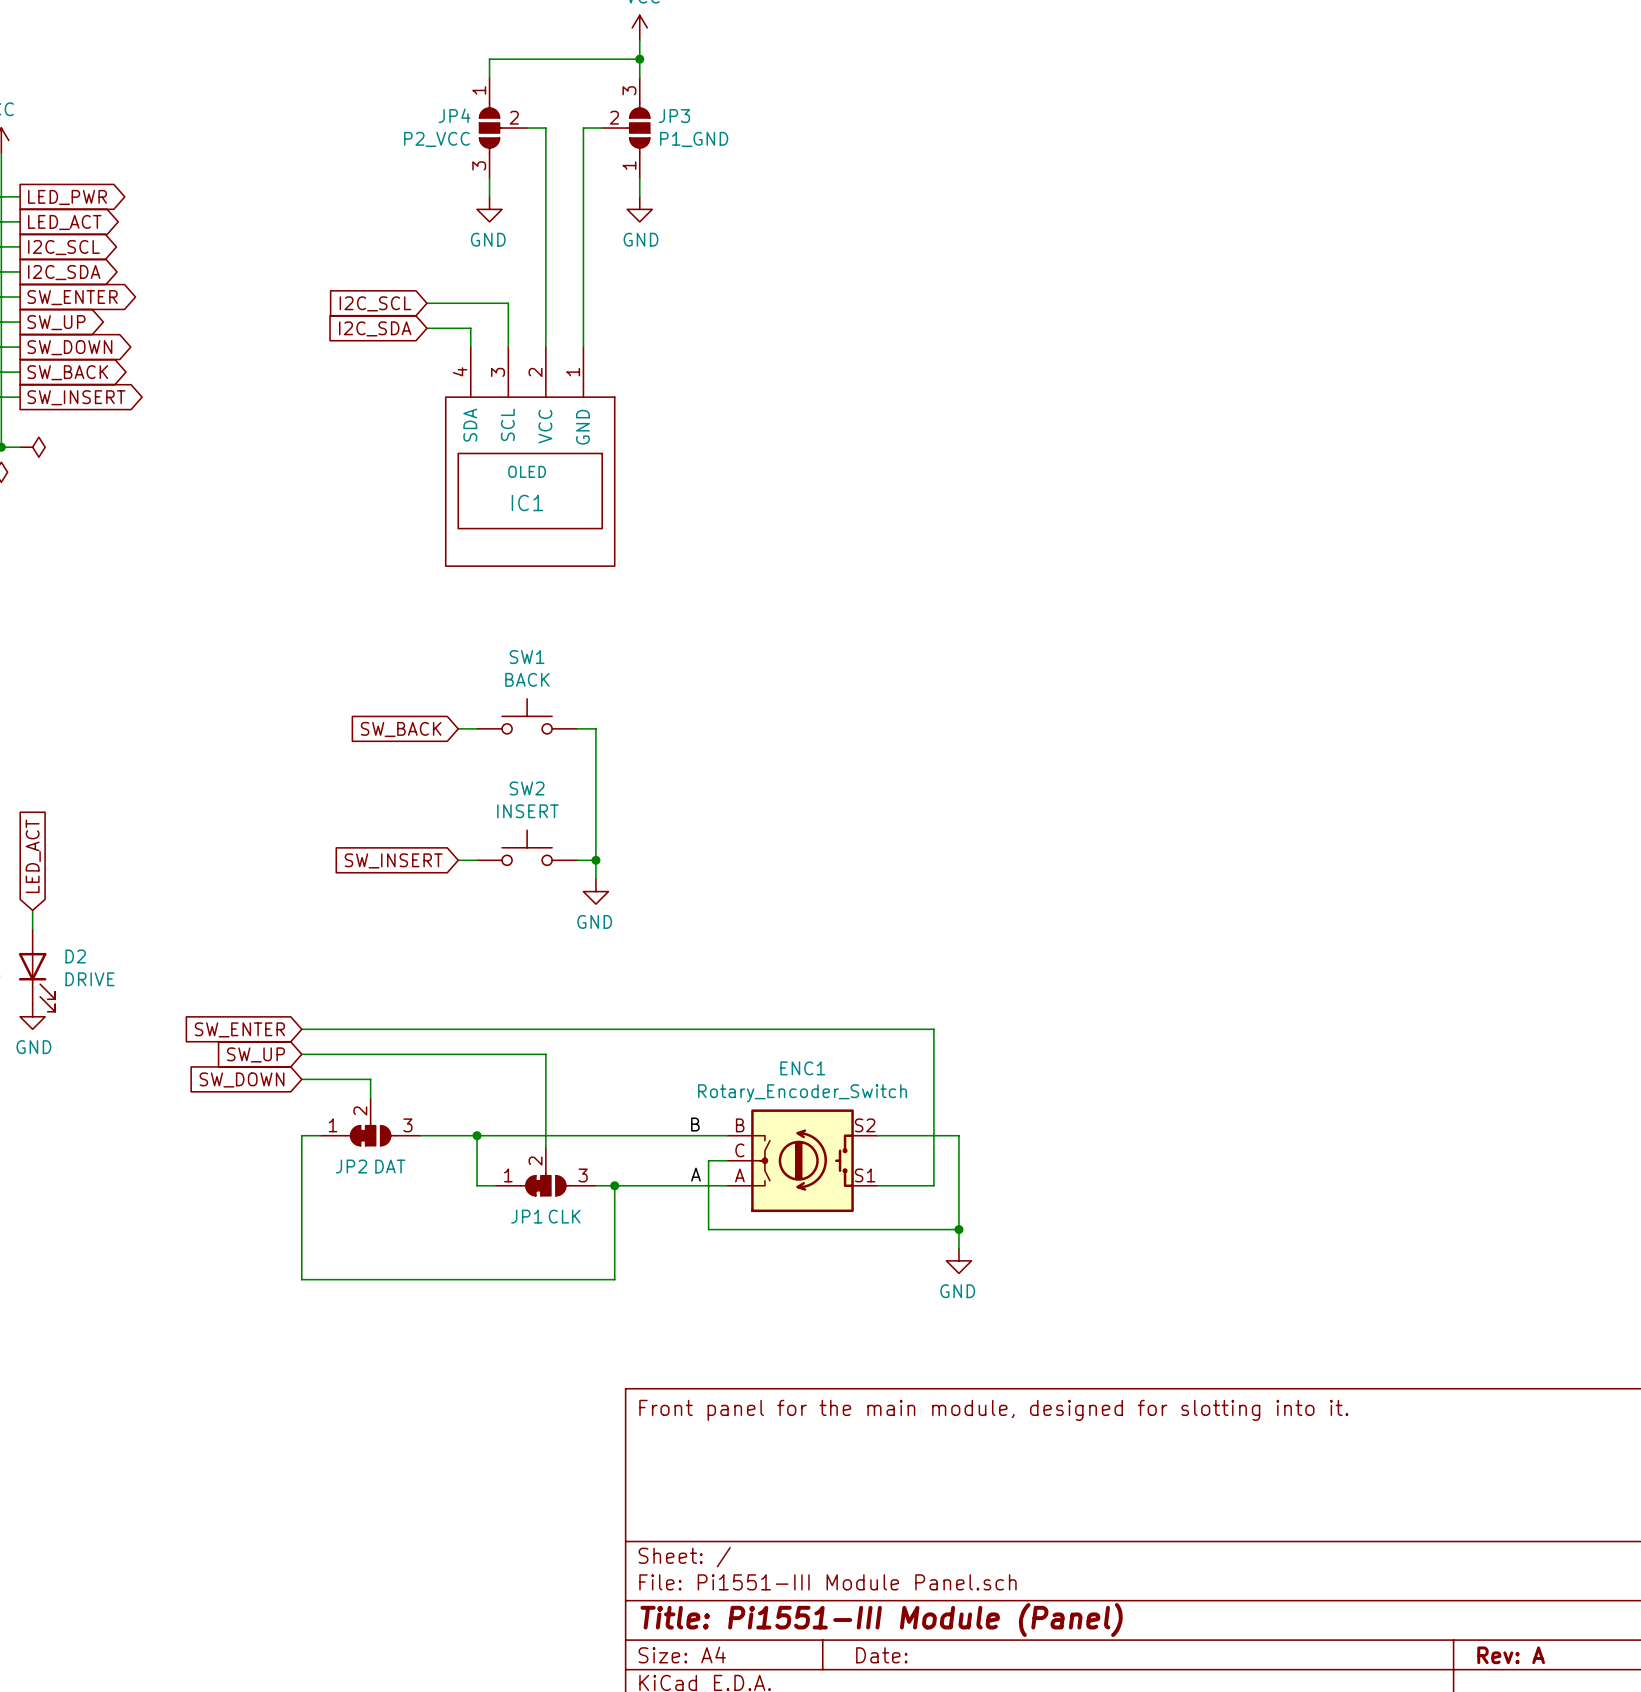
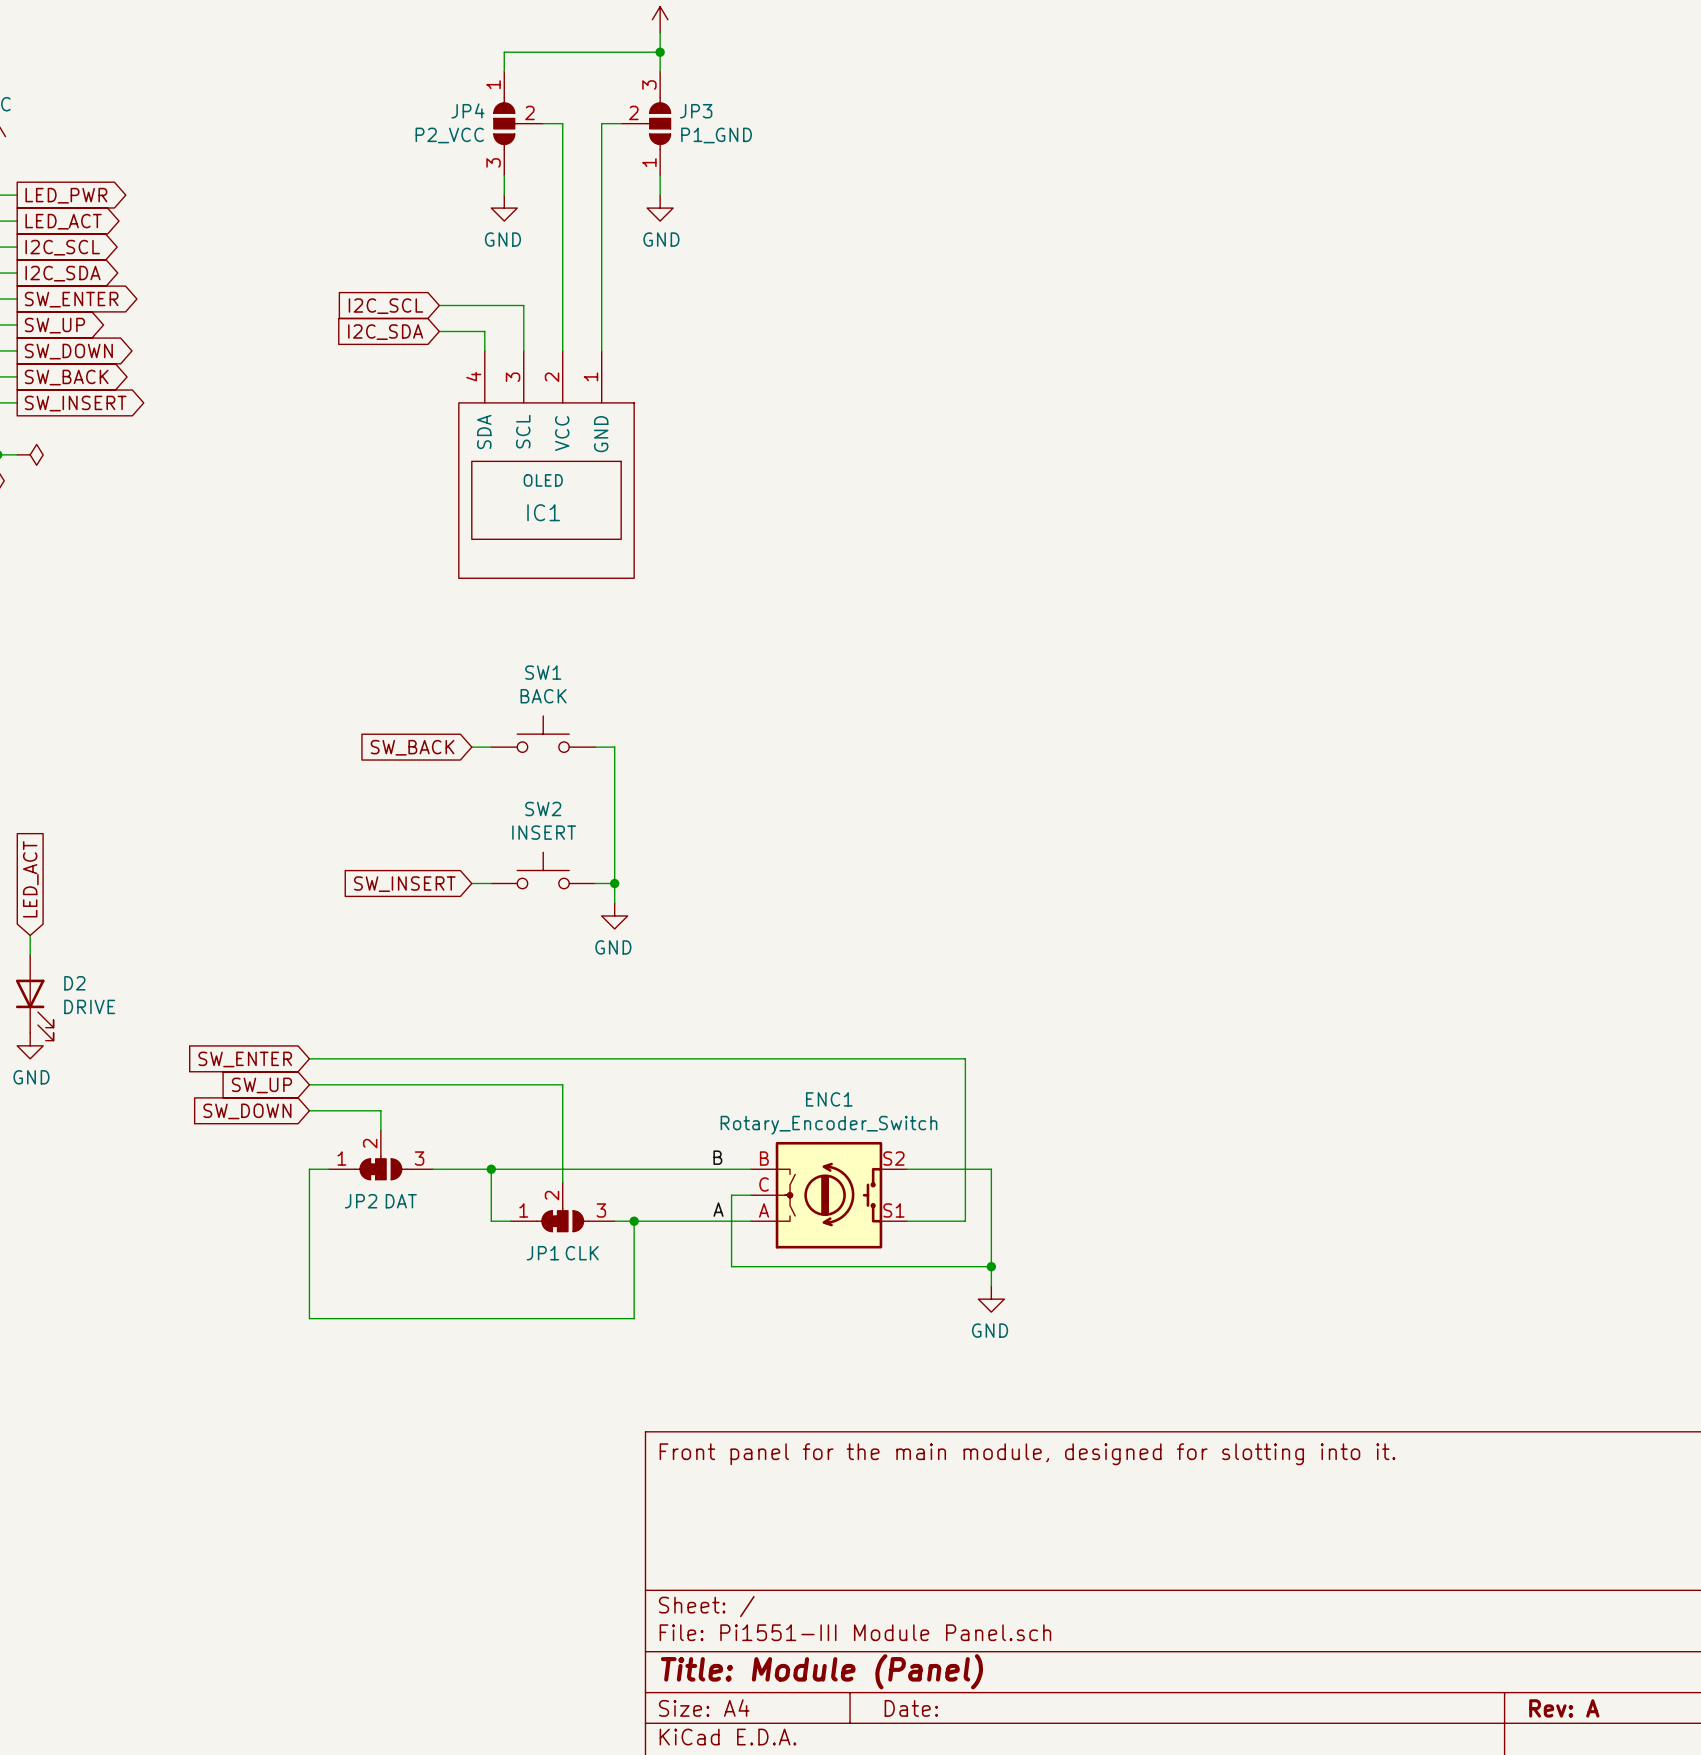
title block: Title: Pi1551-III Module (Panel) (881, 1620) -> Title: Module (Panel) (821, 1671)

